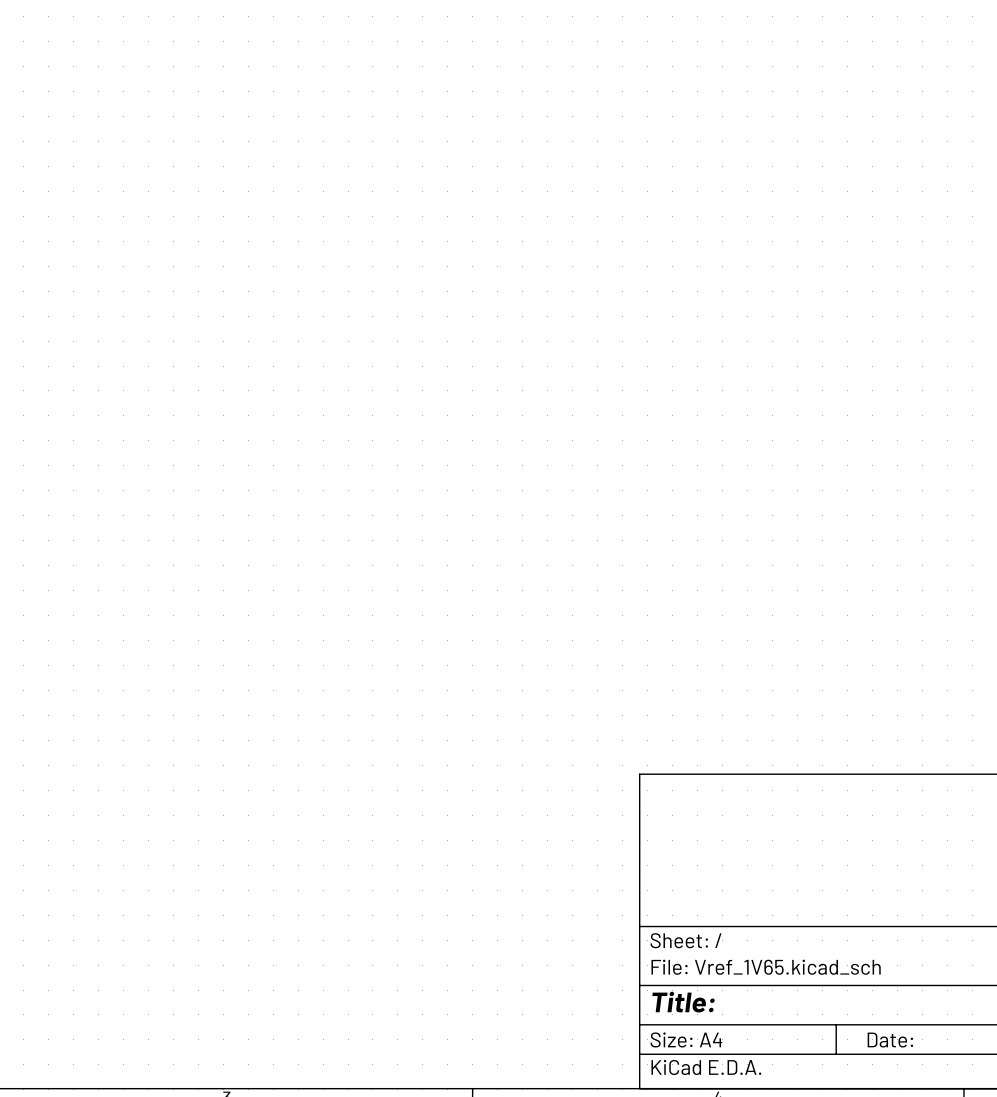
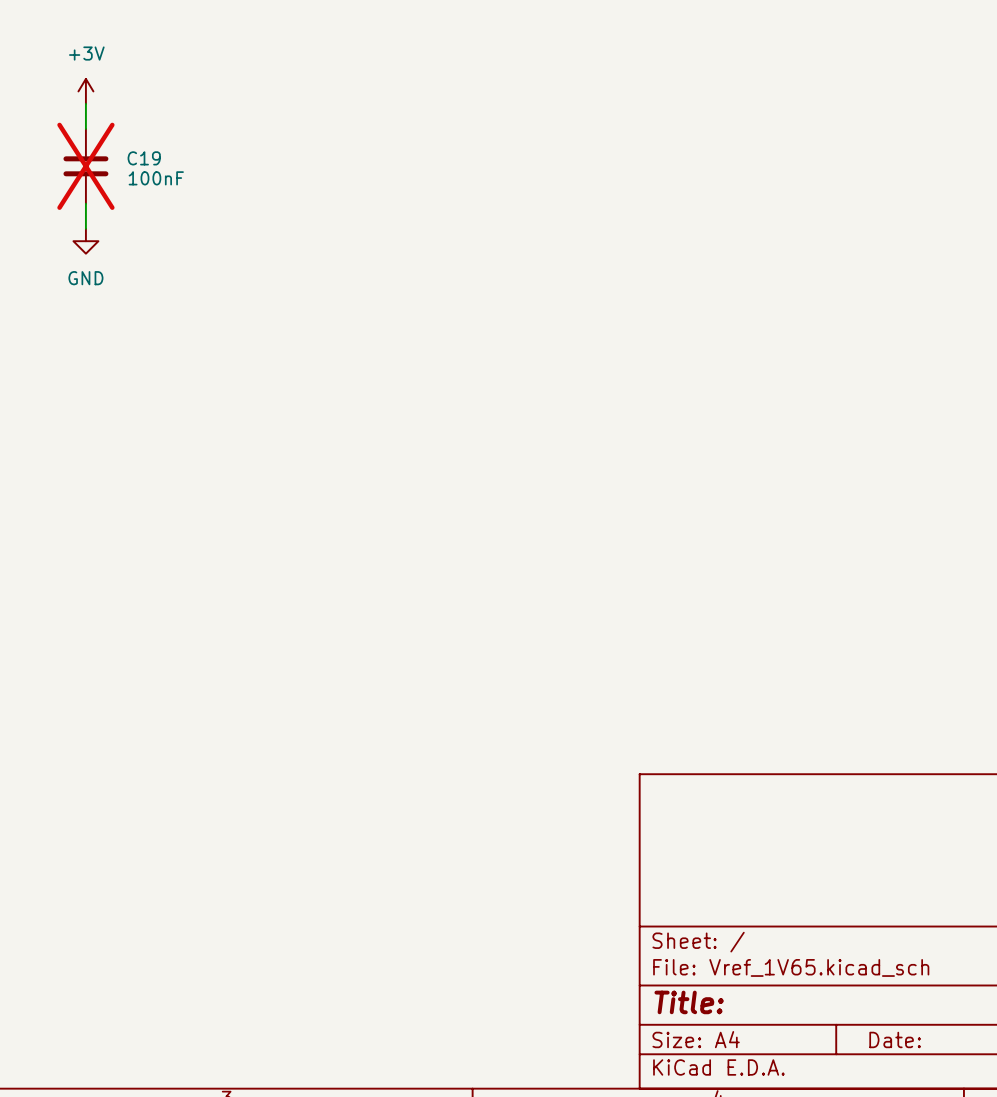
power symbol: none -> +3V (85, 91)
wire: none -> (85, 103) (85, 128)
C19: none -> 100nF (85, 166)
wire: none -> (85, 203) (85, 228)
power symbol: none -> GND (85, 241)

